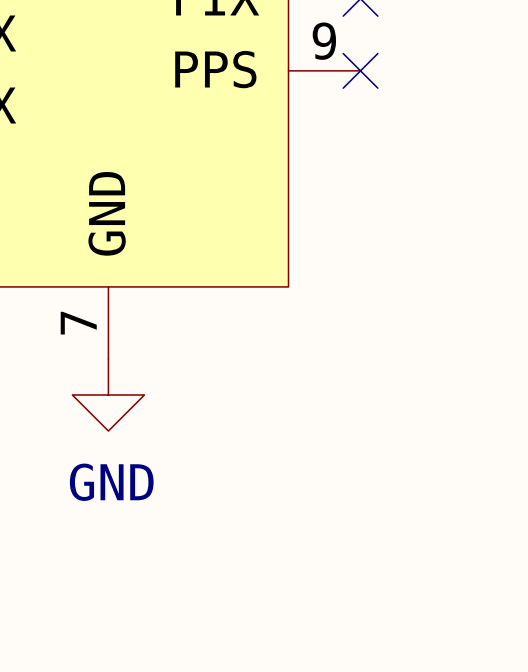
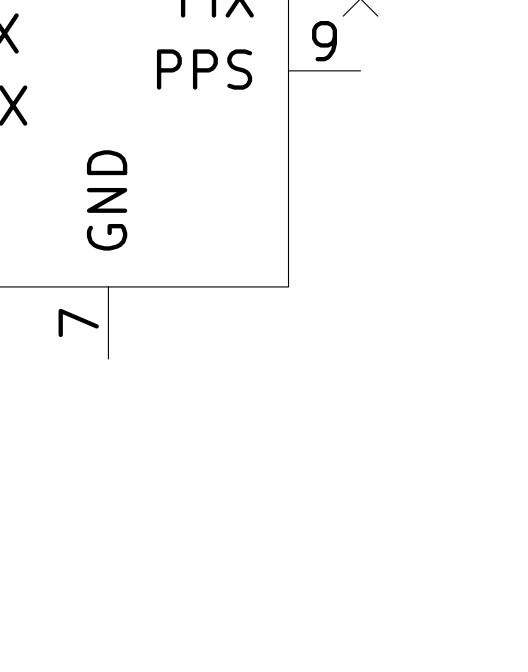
no-connect mark: (360, 70) -> none
power symbol: GND (108, 394) -> none

